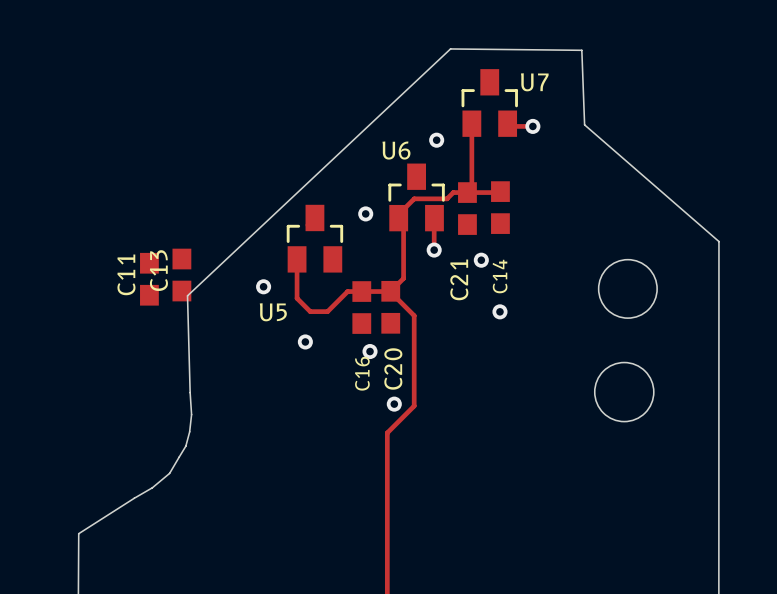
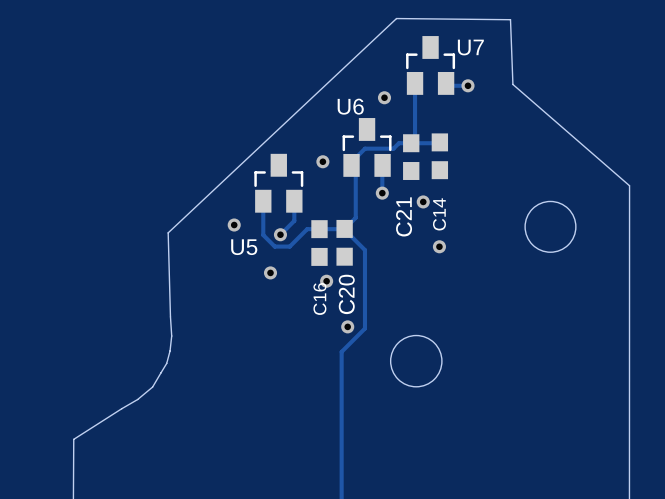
track: none -> (294, 201) (294, 220) (280, 234)
C13: (181, 275) -> none
C11: (149, 279) -> none
via: none -> (280, 234)
round board edge position: (624, 392) -> (416, 361)

